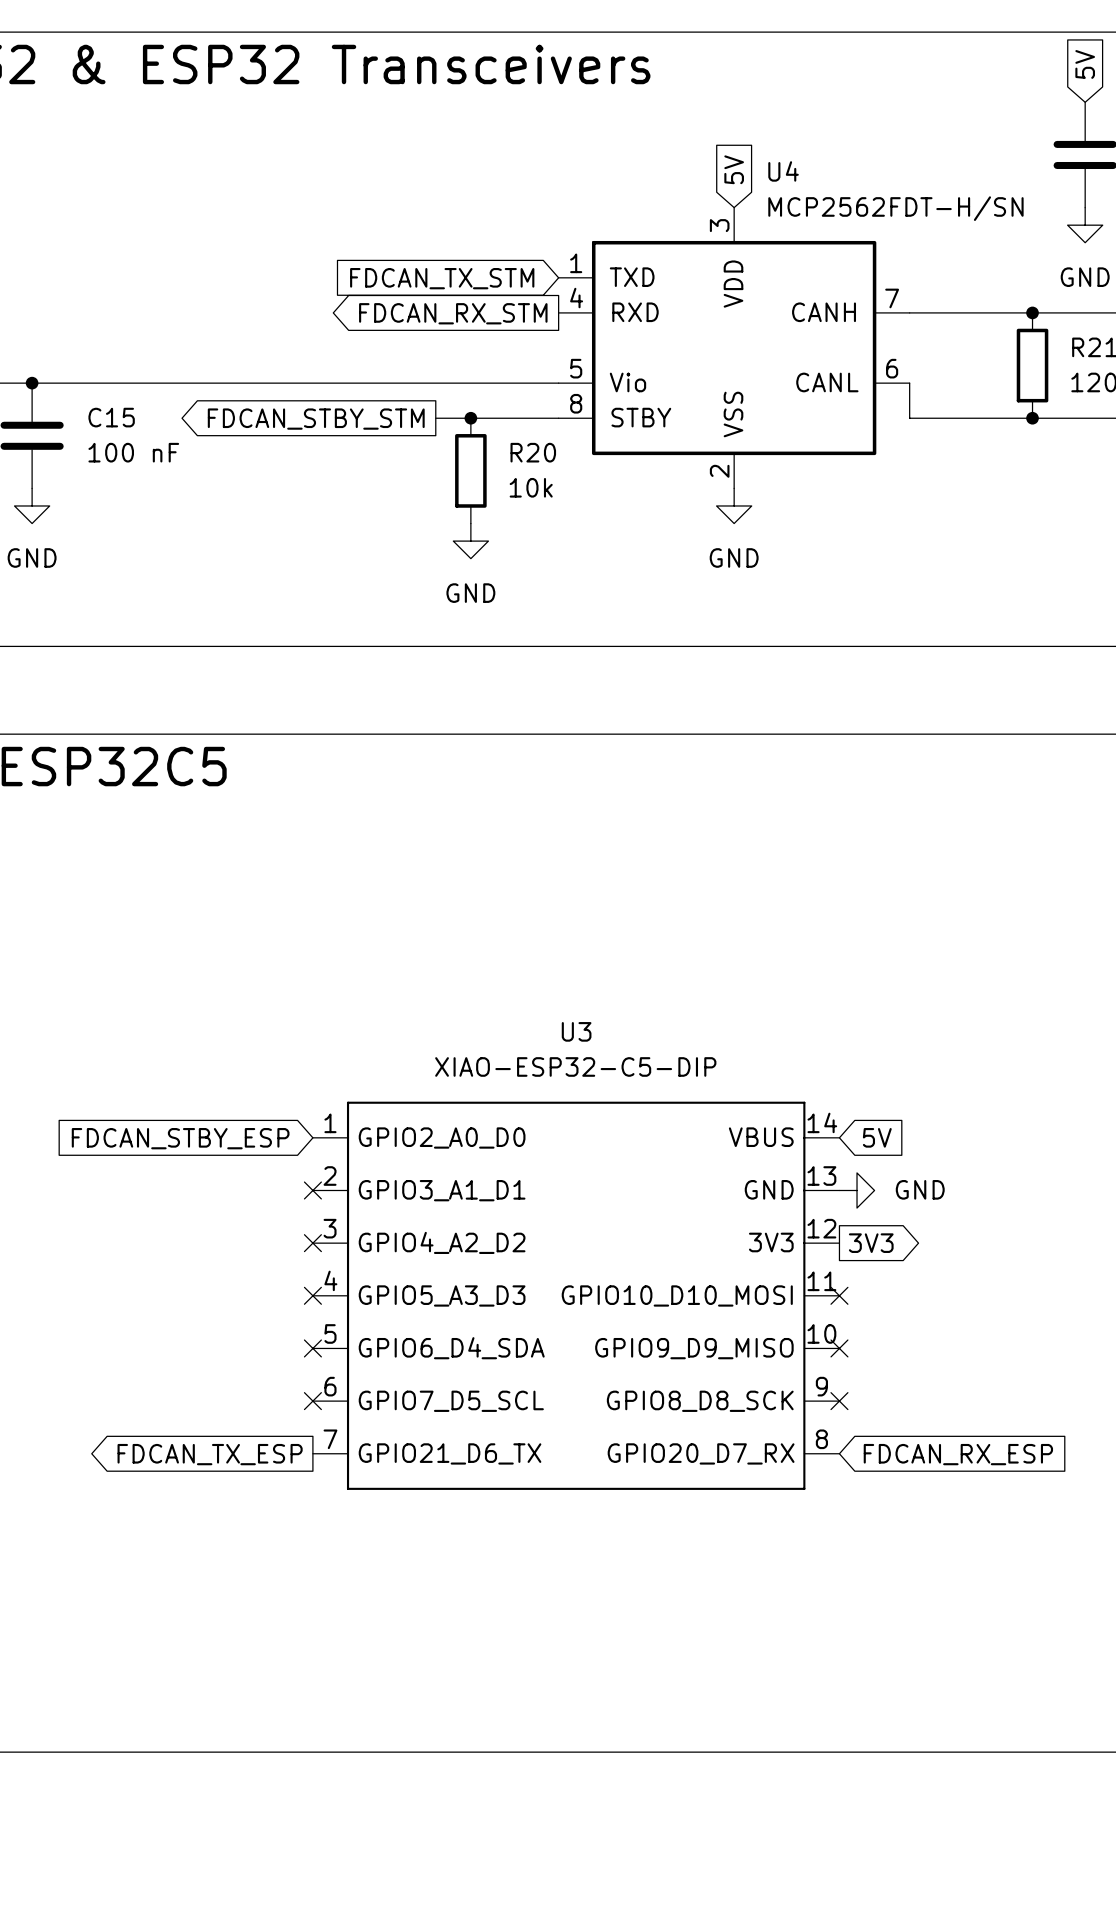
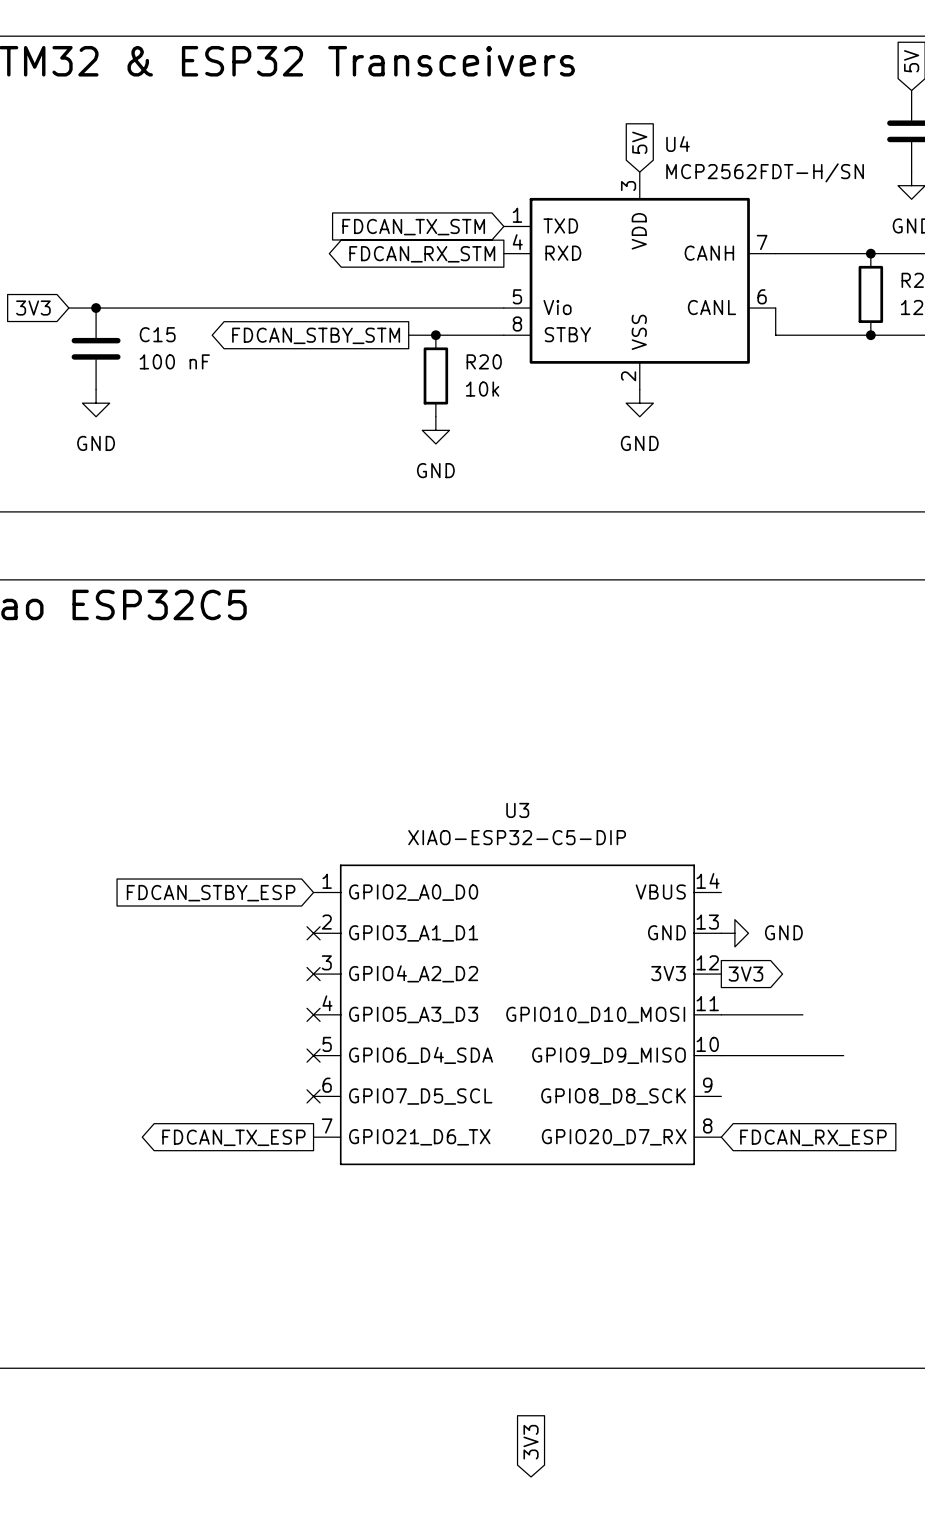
global label: 5V (877, 1137) -> none
wire: none -> (721, 1014) (802, 1014)
no-connect mark: (839, 1295) -> none
wire: none -> (721, 1055) (843, 1055)
no-connect mark: (839, 1348) -> none
no-connect mark: (839, 1401) -> none
global label: none -> 3V3 (531, 1442)

